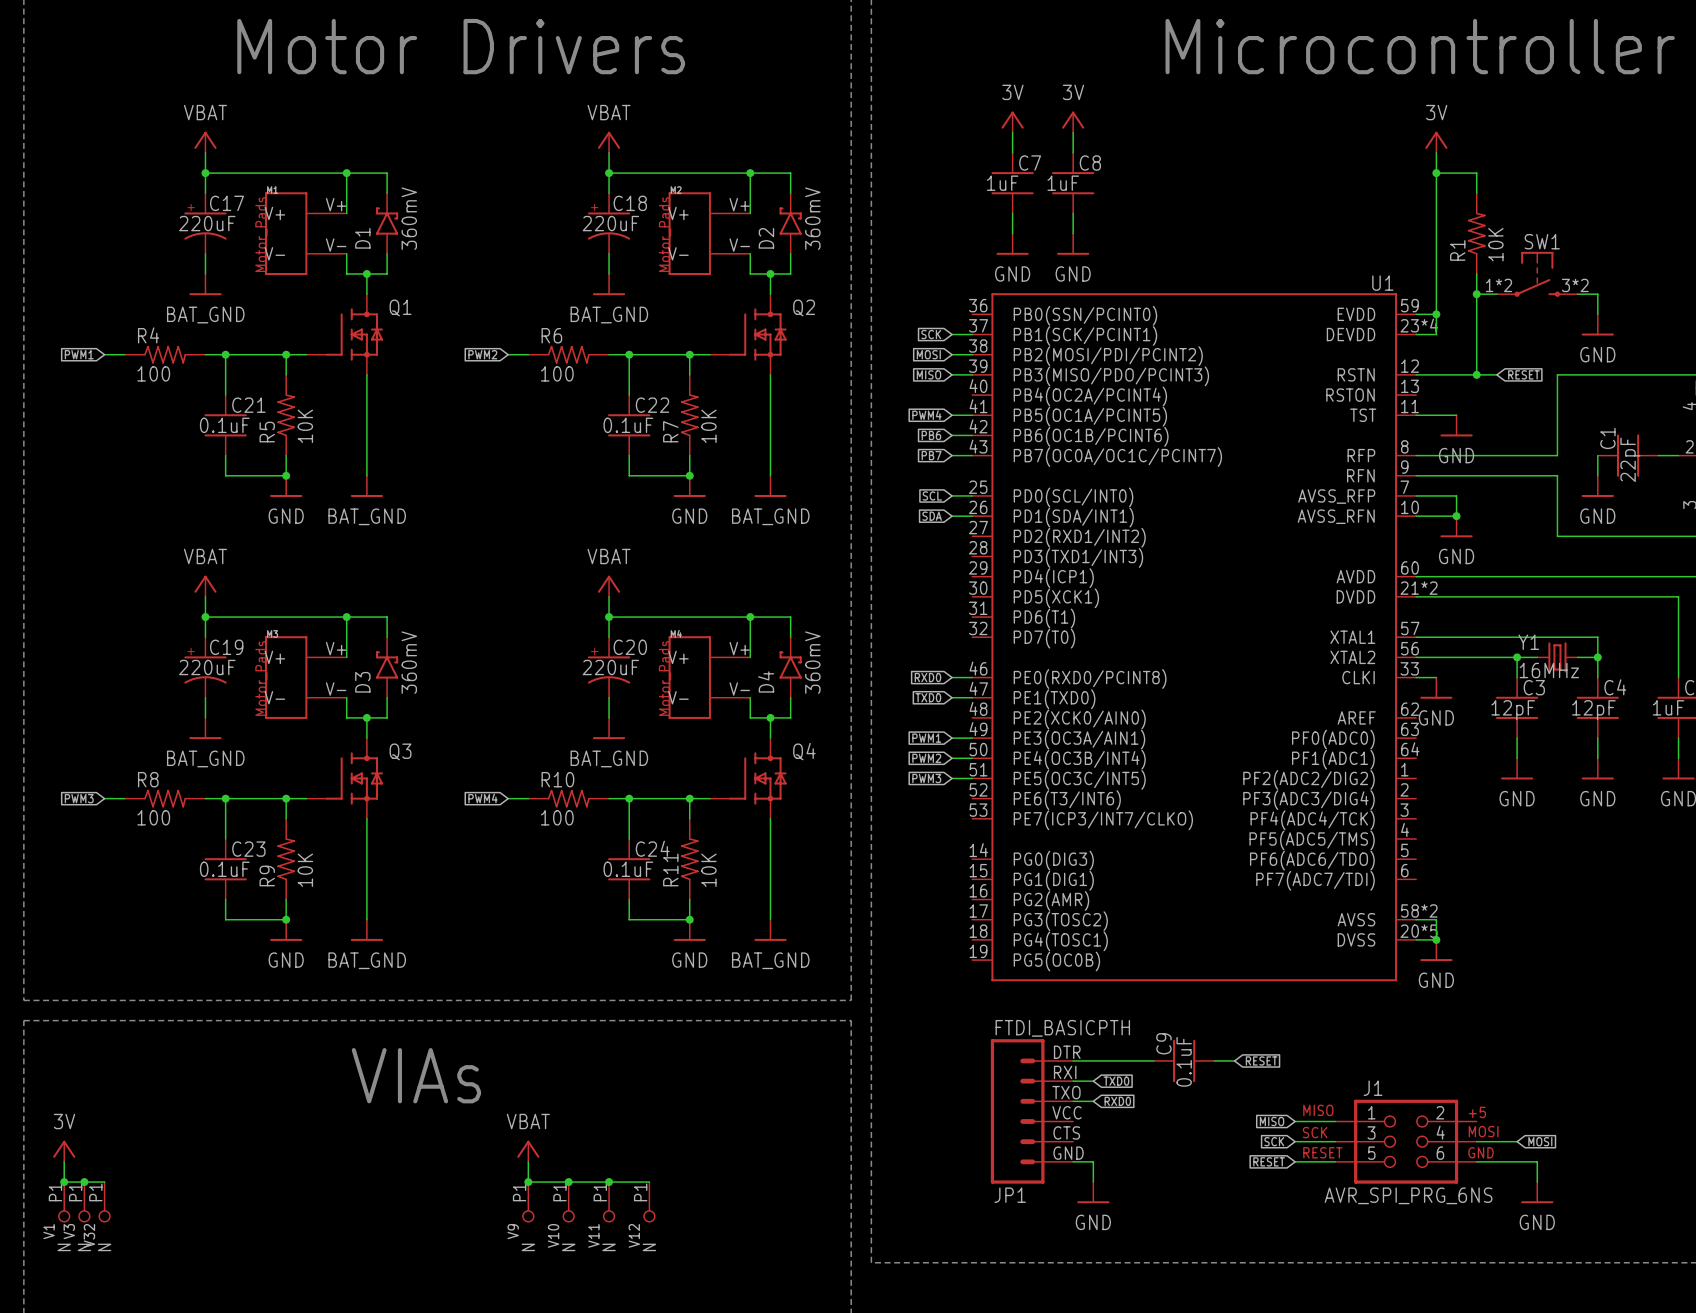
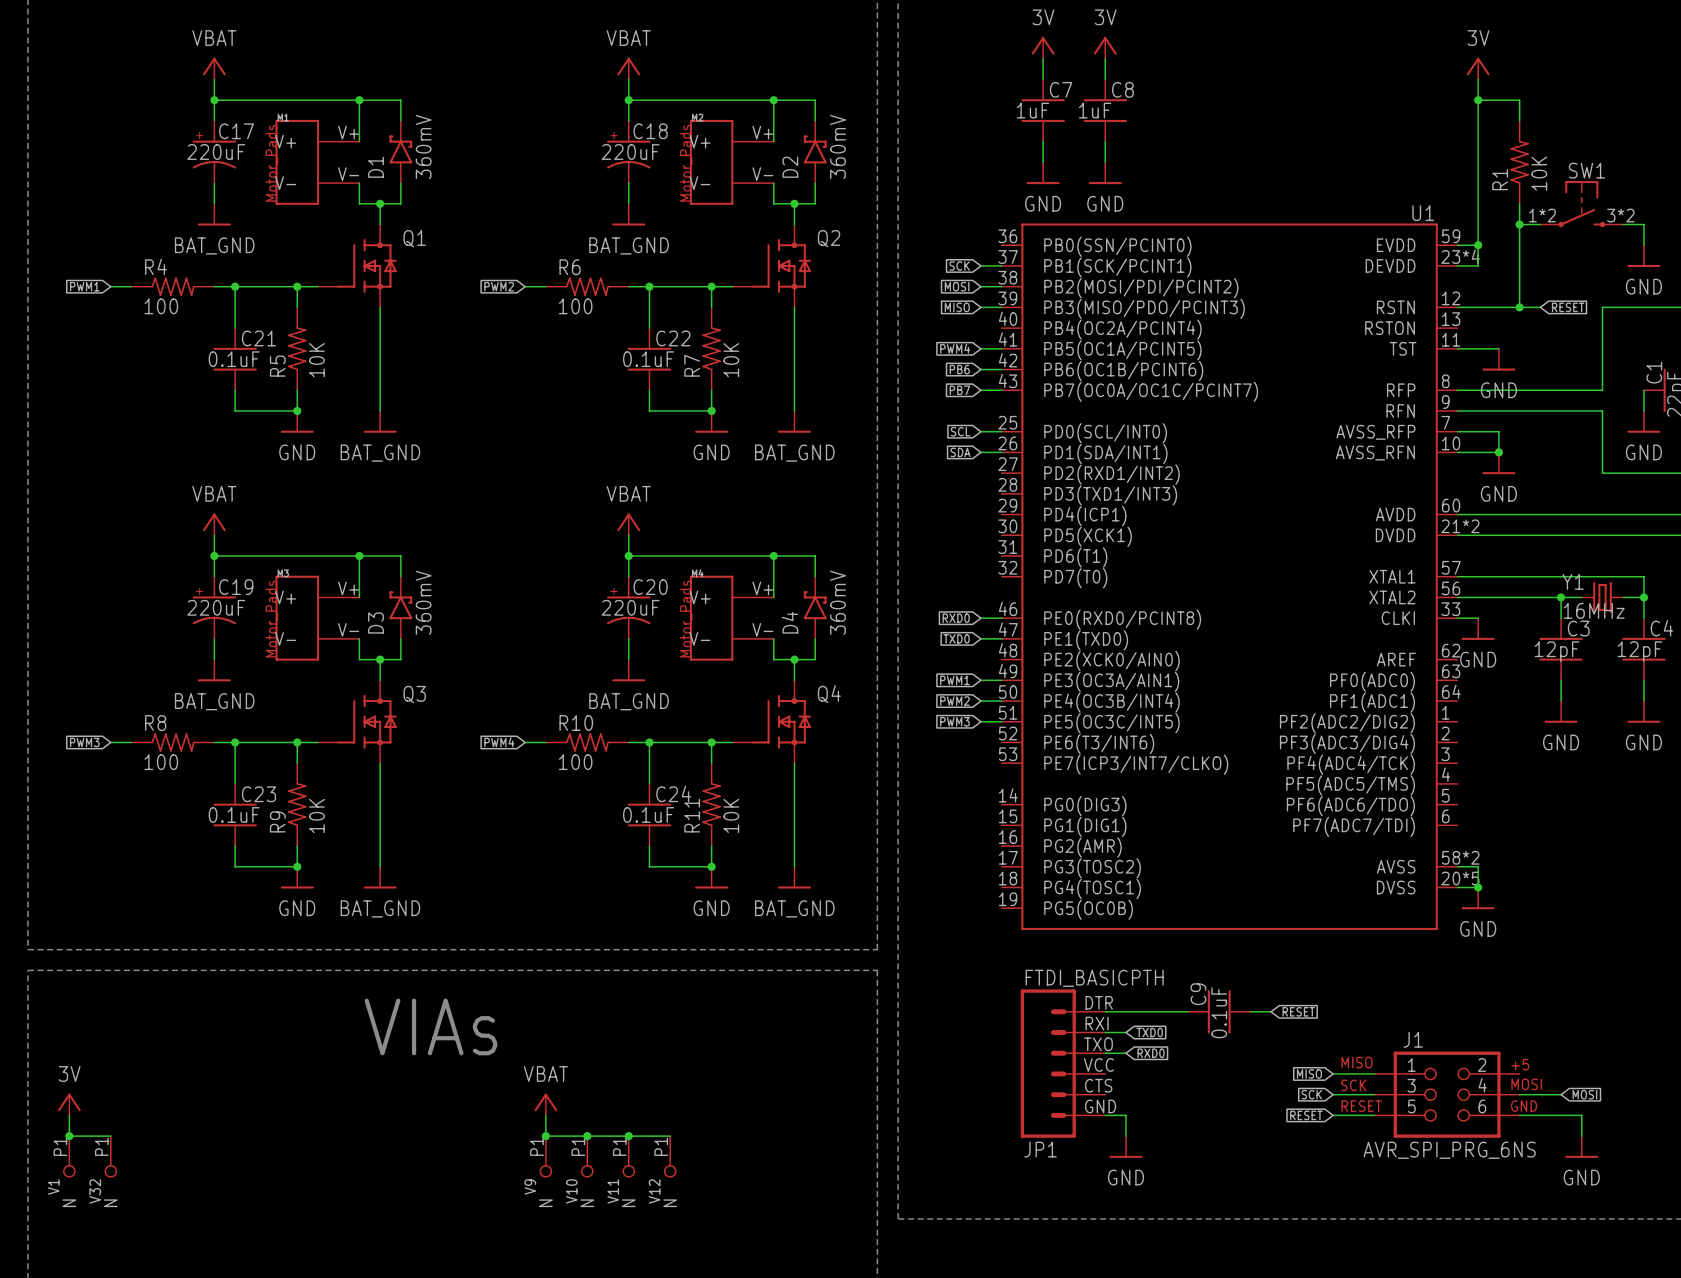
junction: (84, 1182) -> none
V3: (84, 1201) -> none

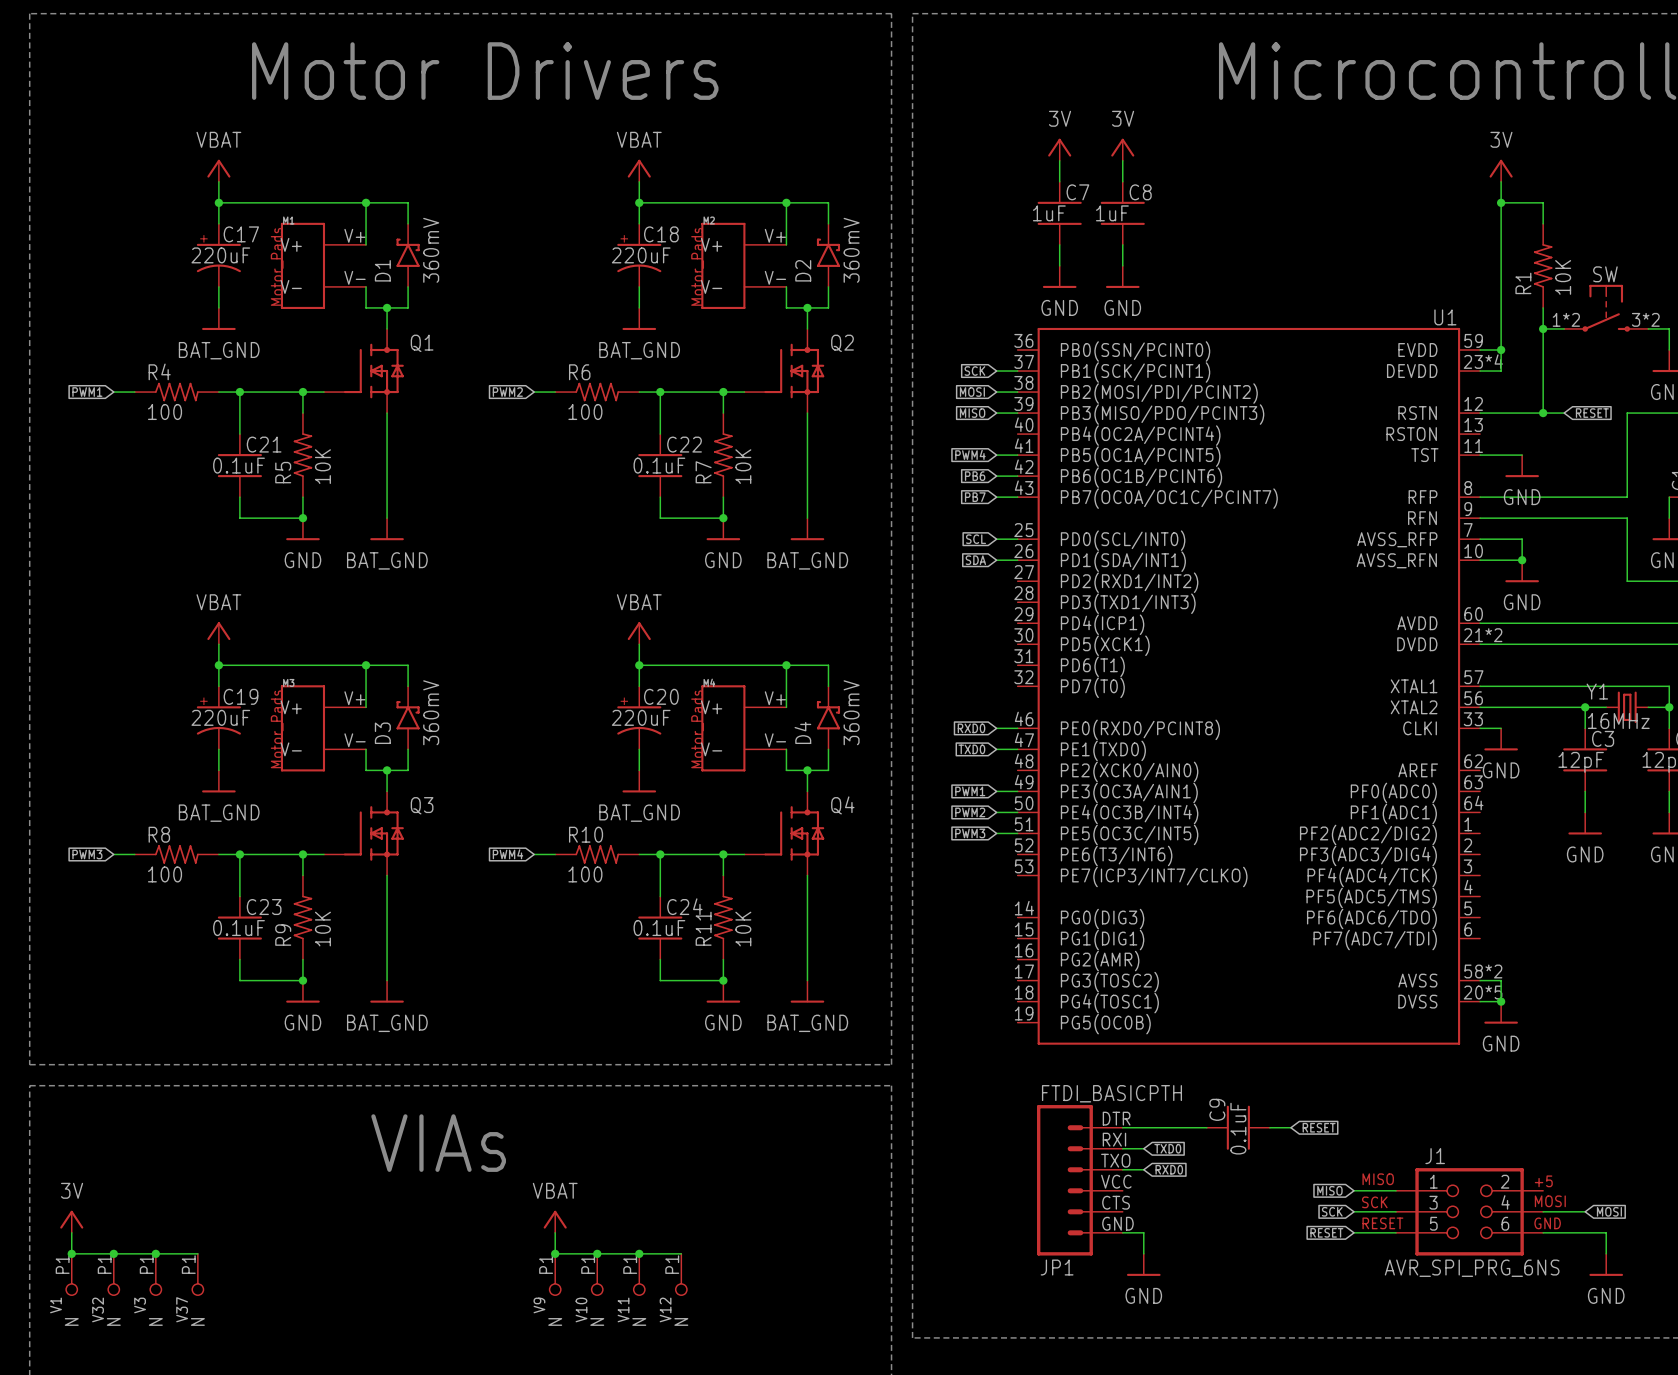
SW1 name: SW1 (1586, 170) -> SW (1605, 274)
wire: none -> (113, 1253) (197, 1253)
junction: none -> (113, 1253)
junction: none -> (155, 1253)
V3: none -> (155, 1274)
V37: none -> (197, 1274)

